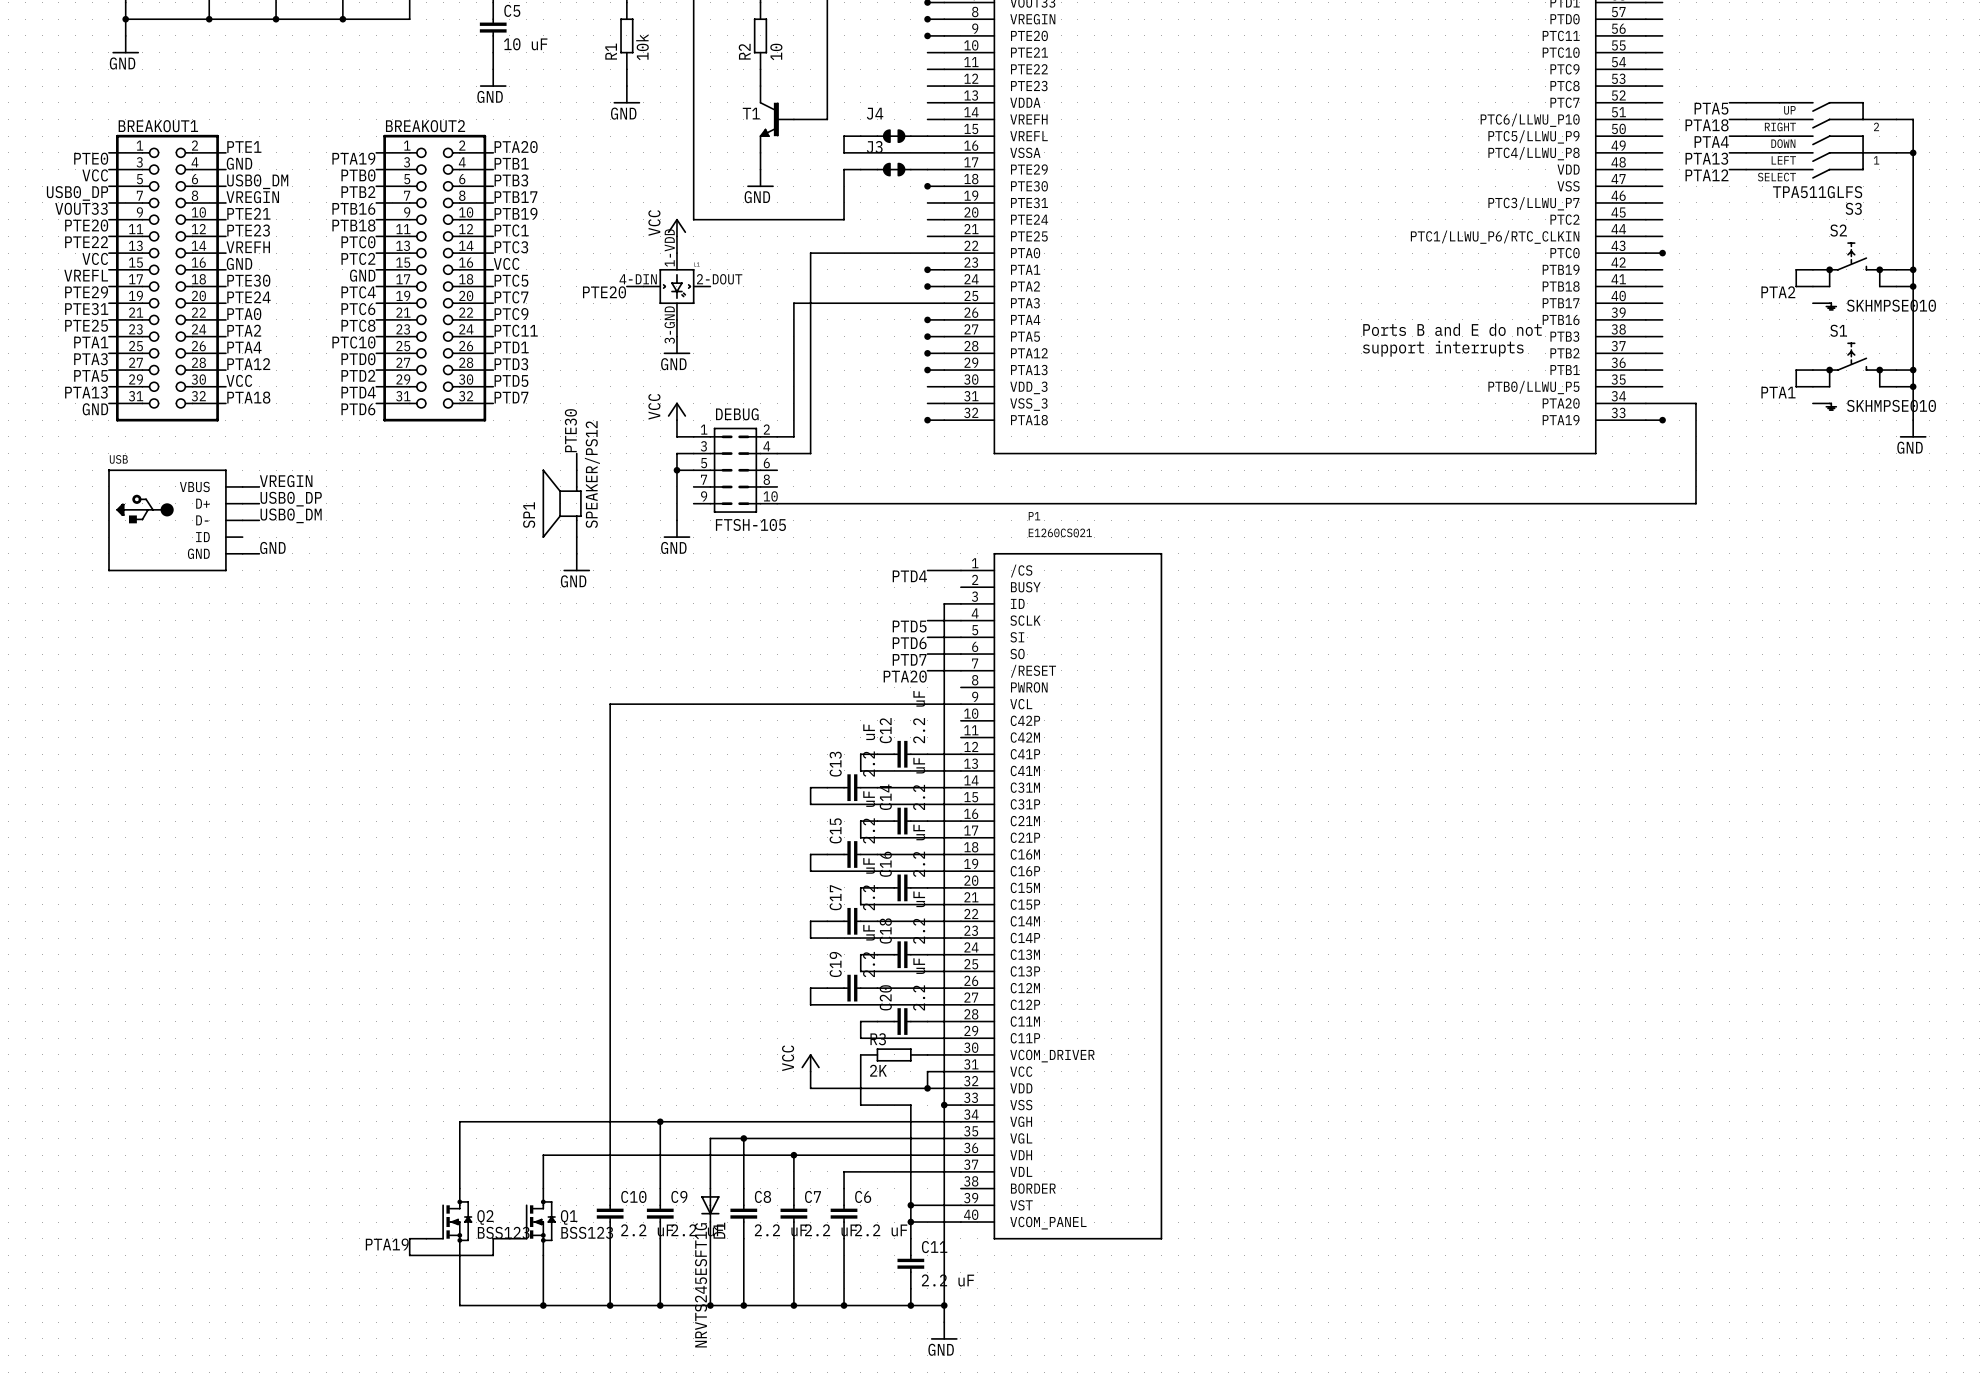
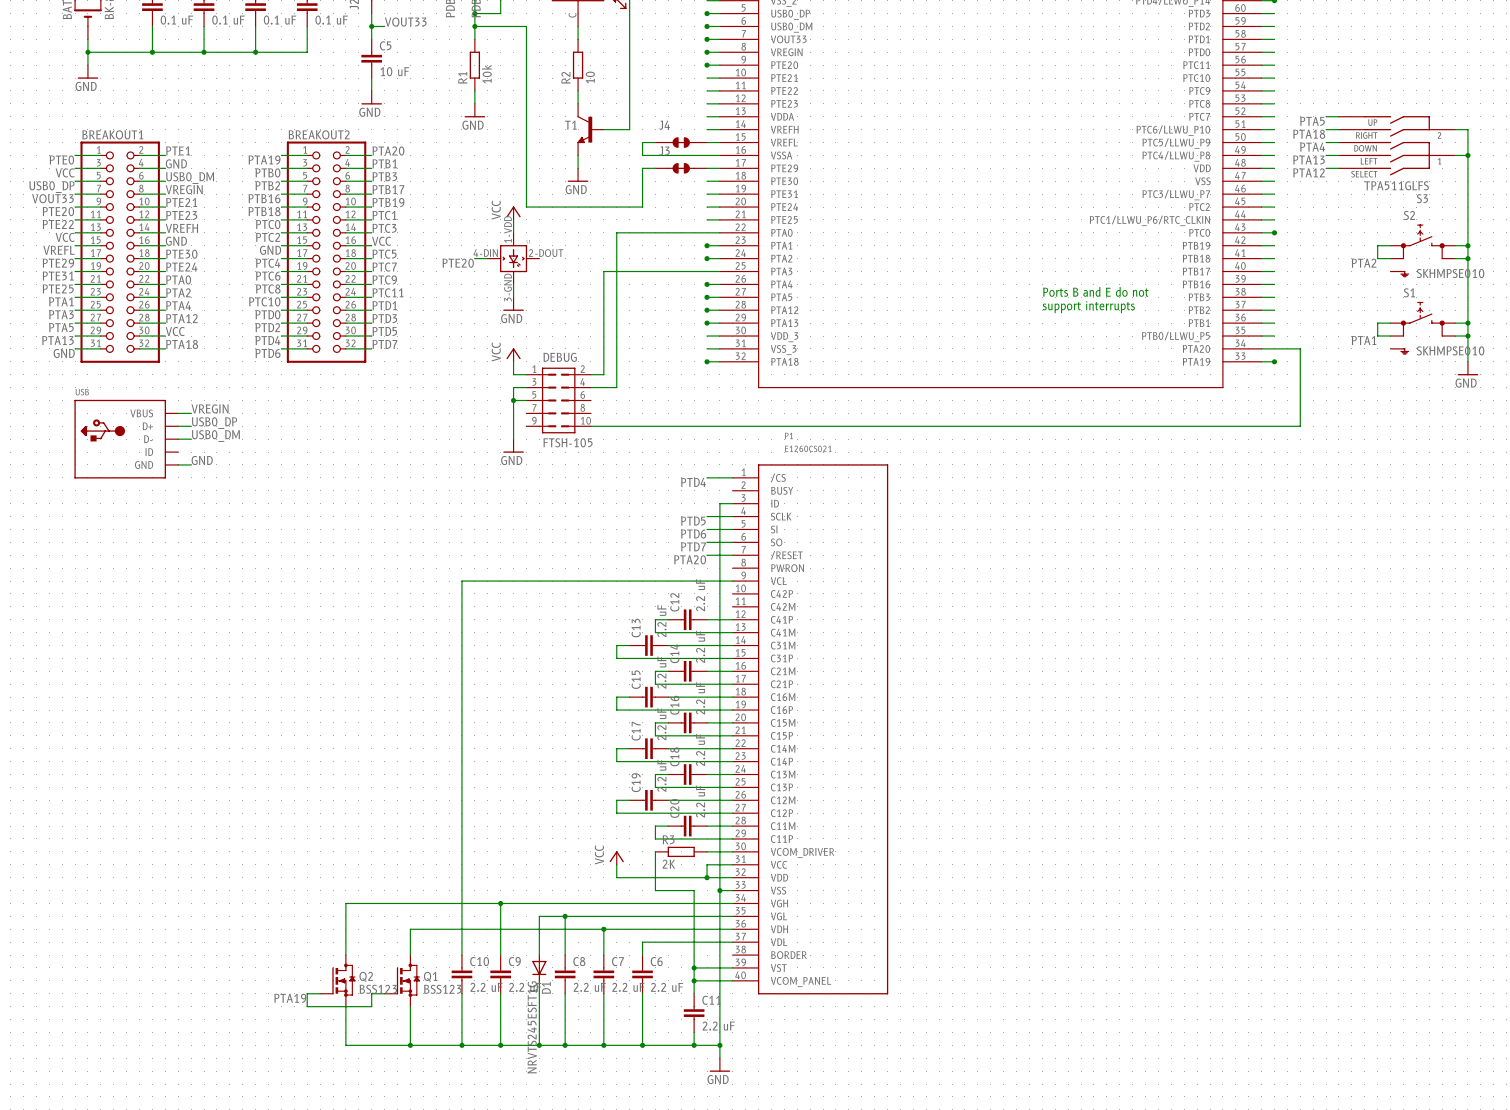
junction: (927, 186) -> none
label: PTE30 (570, 430) -> none
wire: (576, 453) (576, 470) -> none
SP1: SPEAKER/PS12 (562, 503) -> none
wire: (576, 537) (576, 553) -> none
power symbol: GND (576, 562) -> none

